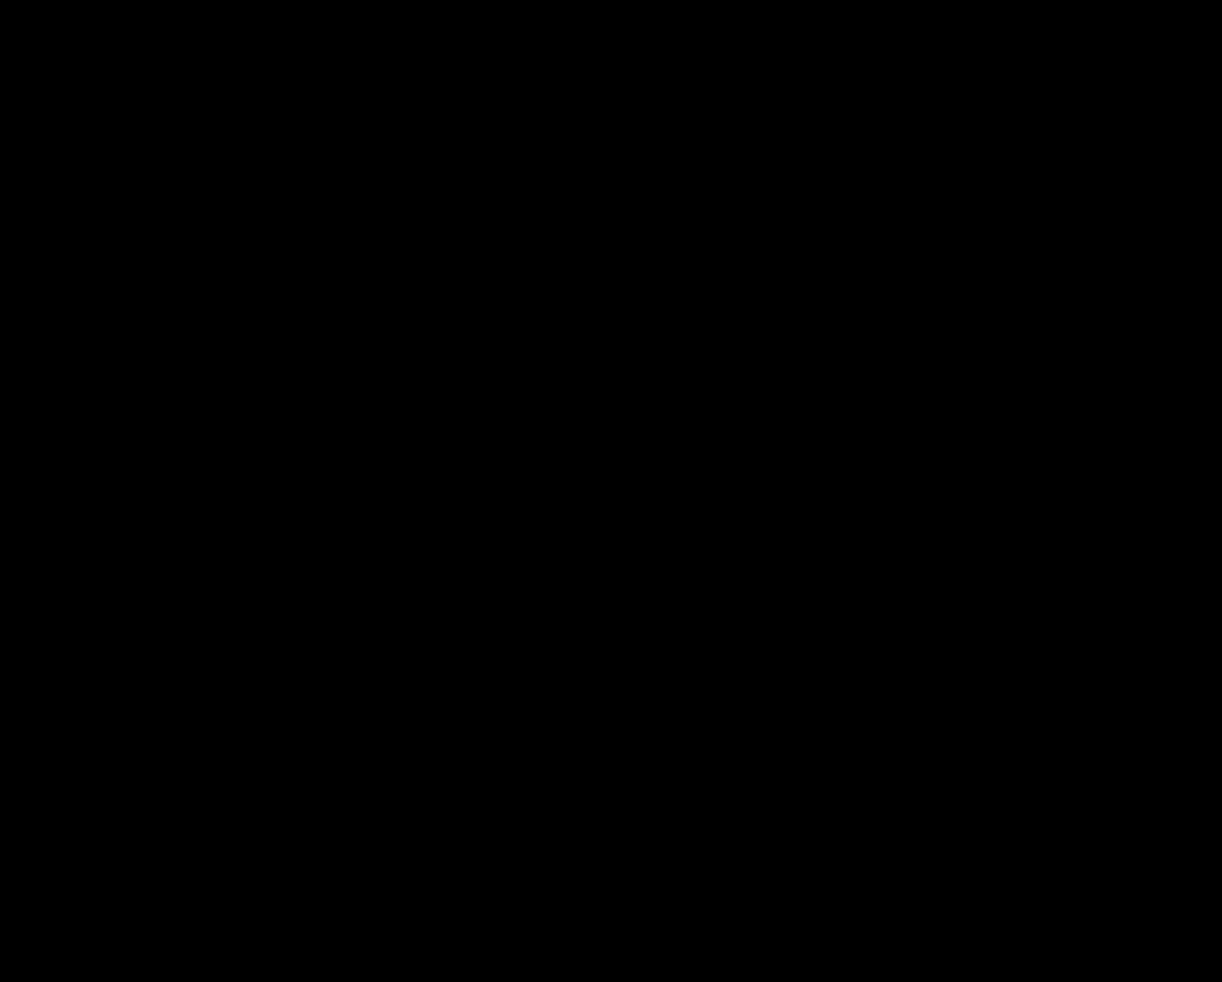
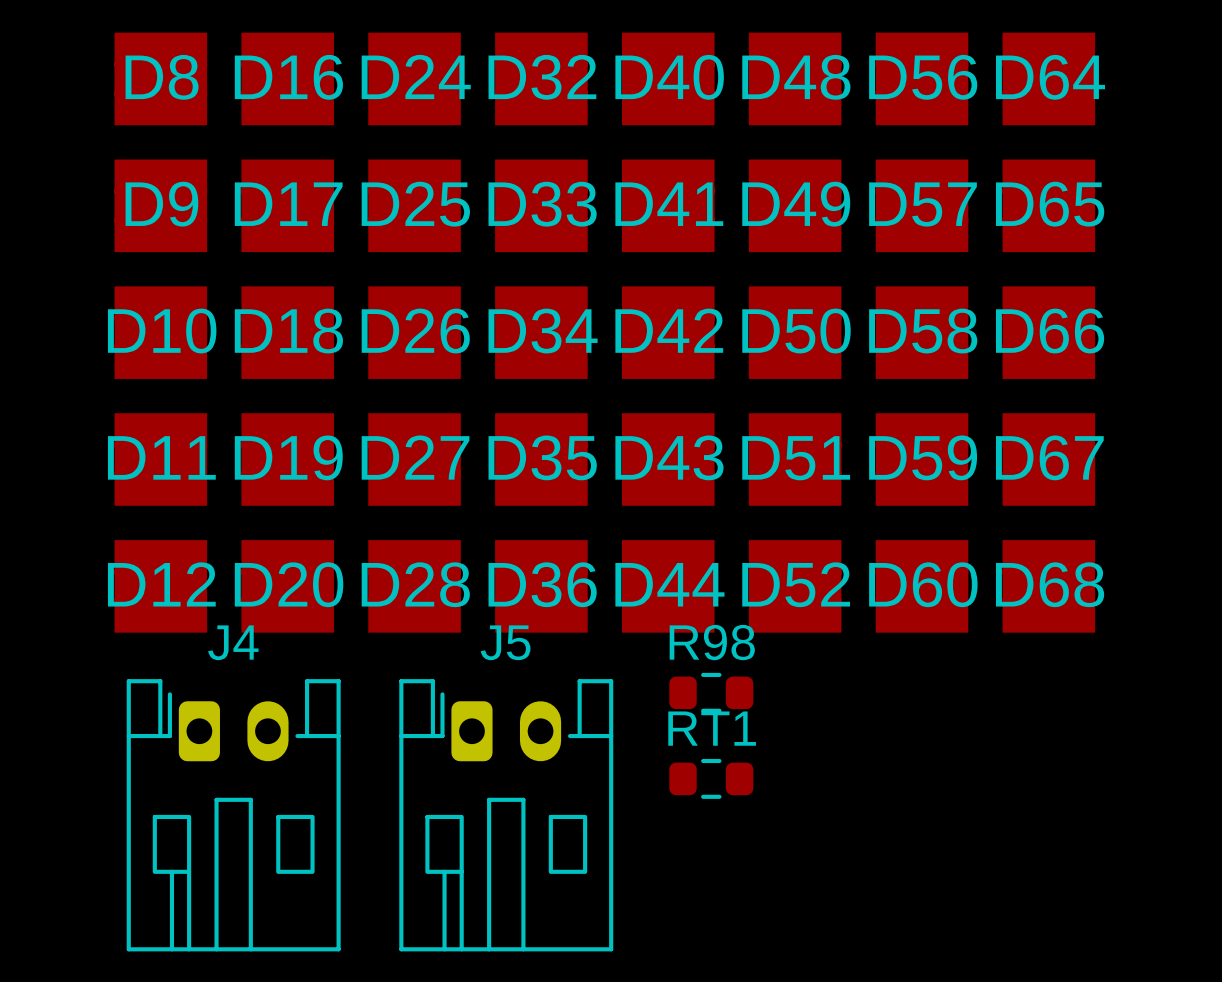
D8: none -> (160, 78)
D16: none -> (287, 78)
D24: none -> (414, 78)
D32: none -> (541, 78)
D40: none -> (668, 78)
D48: none -> (795, 78)
D56: none -> (921, 78)
D64: none -> (1048, 78)
D9: none -> (160, 205)
D17: none -> (287, 205)
D25: none -> (414, 205)
D33: none -> (541, 205)
D41: none -> (668, 205)
D49: none -> (795, 205)
D57: none -> (921, 205)
D65: none -> (1048, 205)
D10: none -> (160, 332)
D18: none -> (287, 332)
D26: none -> (414, 332)
D34: none -> (541, 332)
D42: none -> (668, 332)
D50: none -> (795, 332)
D58: none -> (921, 332)
D66: none -> (1048, 332)
D11: none -> (160, 459)
D19: none -> (287, 459)
D27: none -> (414, 459)
D35: none -> (541, 459)
D43: none -> (668, 459)
D51: none -> (795, 459)
D59: none -> (921, 459)
D67: none -> (1048, 459)
D12: none -> (160, 586)
D20: none -> (287, 586)
D28: none -> (414, 586)
D36: none -> (541, 586)
D44: none -> (668, 586)
D52: none -> (795, 586)
D60: none -> (921, 586)
D68: none -> (1048, 586)
R98: none -> (711, 692)
RT1: none -> (711, 778)
J4: none -> (233, 815)
J5: none -> (506, 815)

